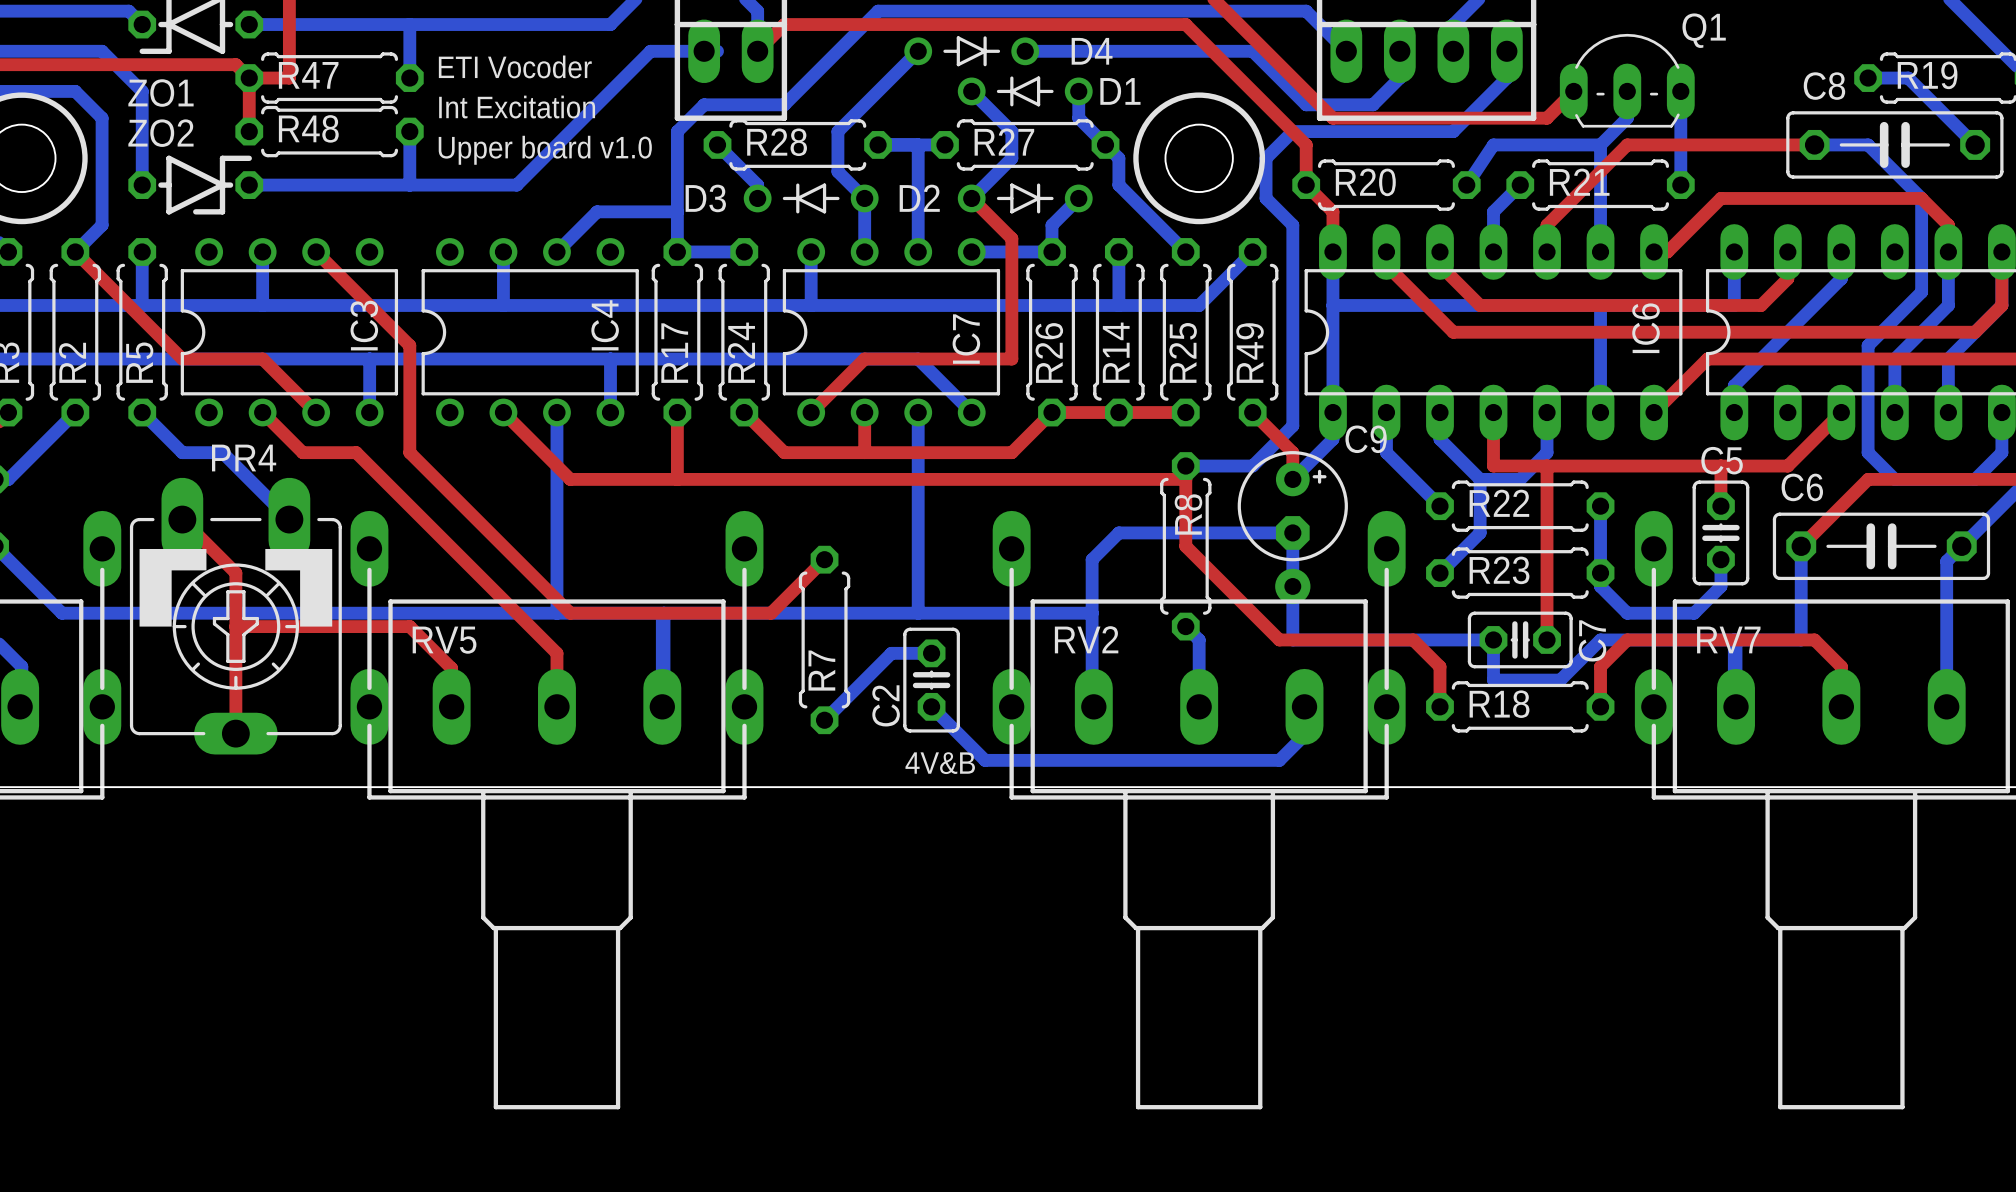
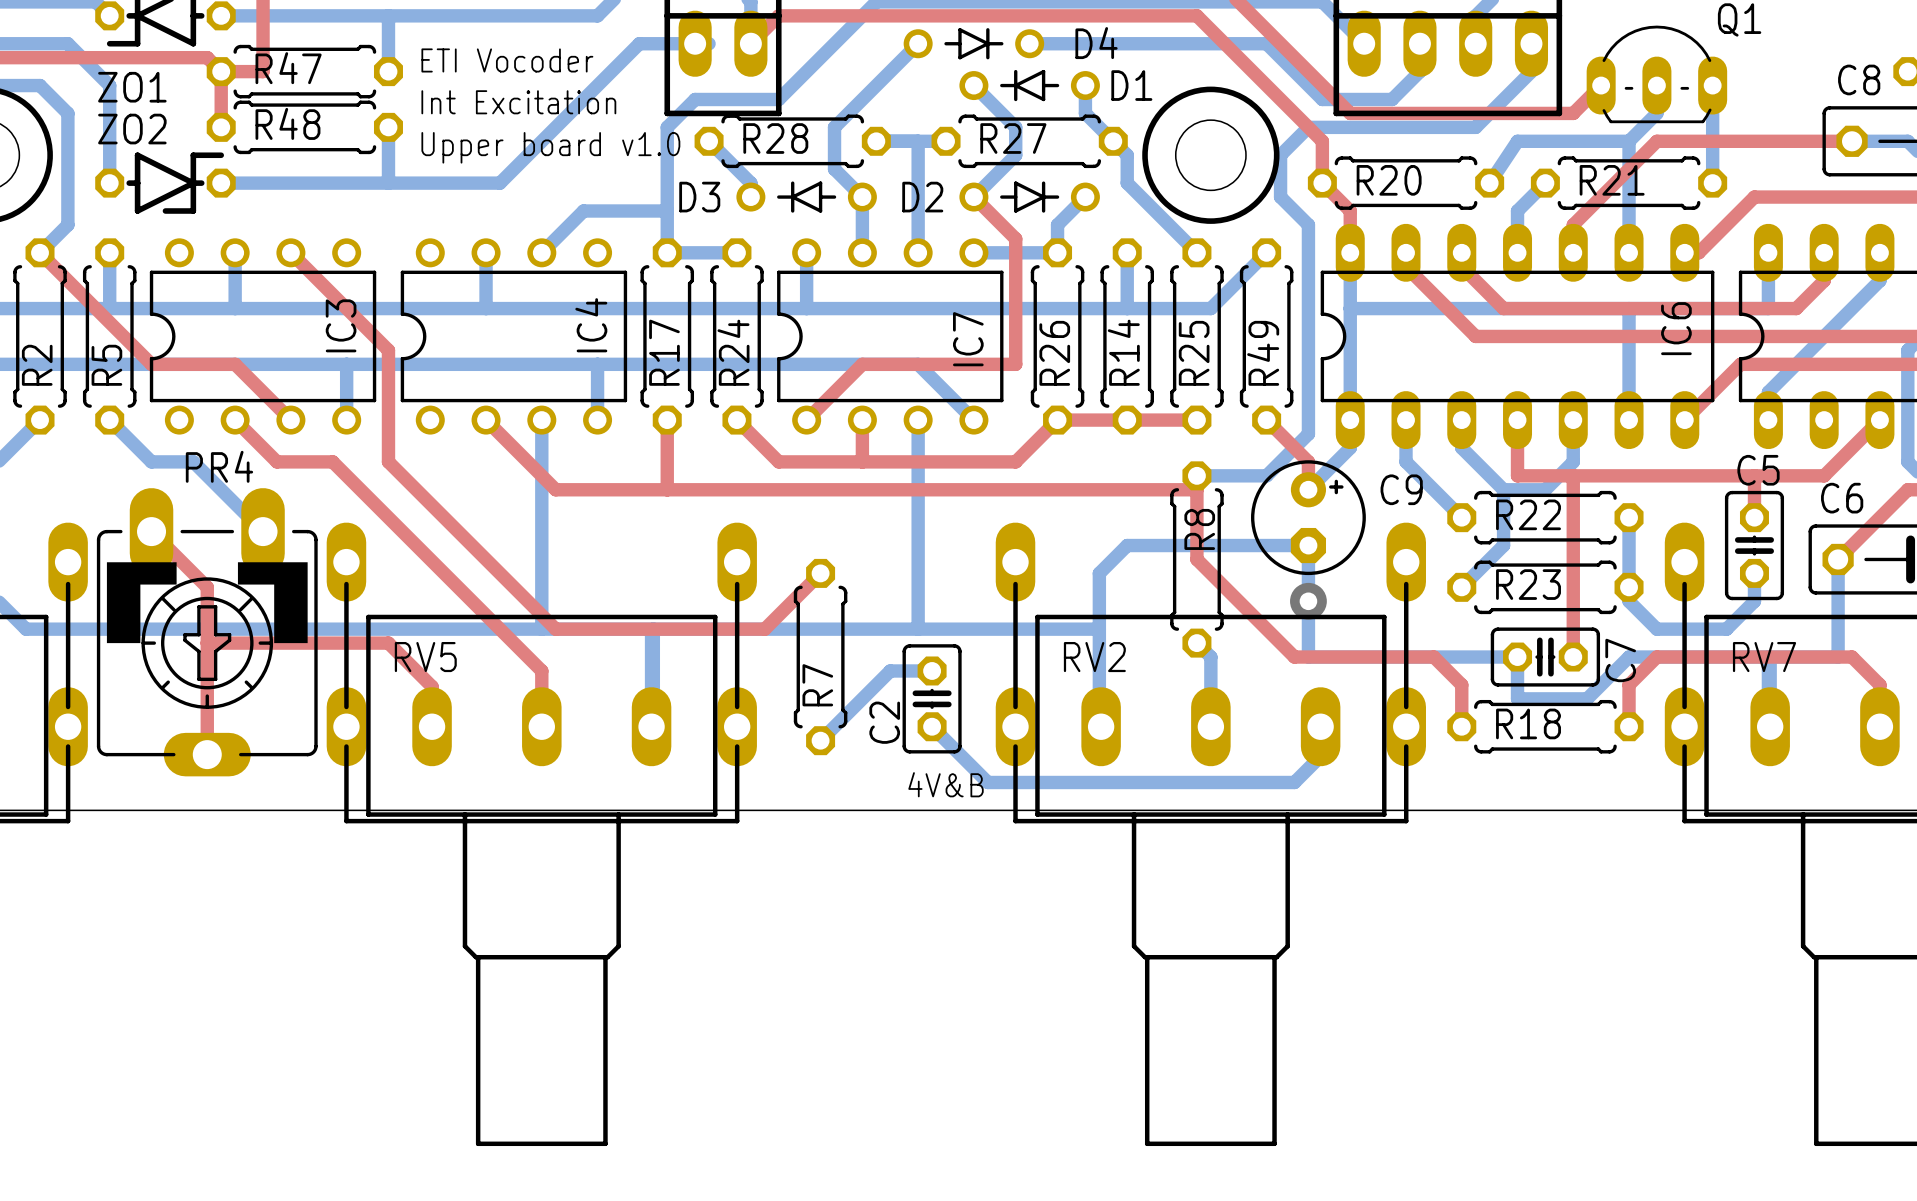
C9 name position: C9 (1366, 439) -> C9 (1401, 489)

